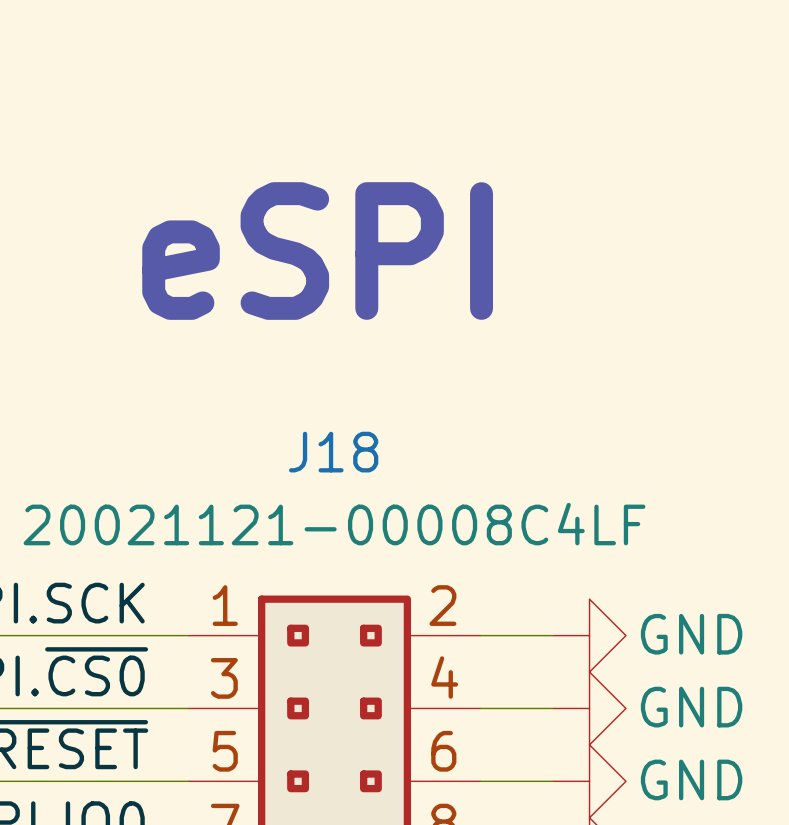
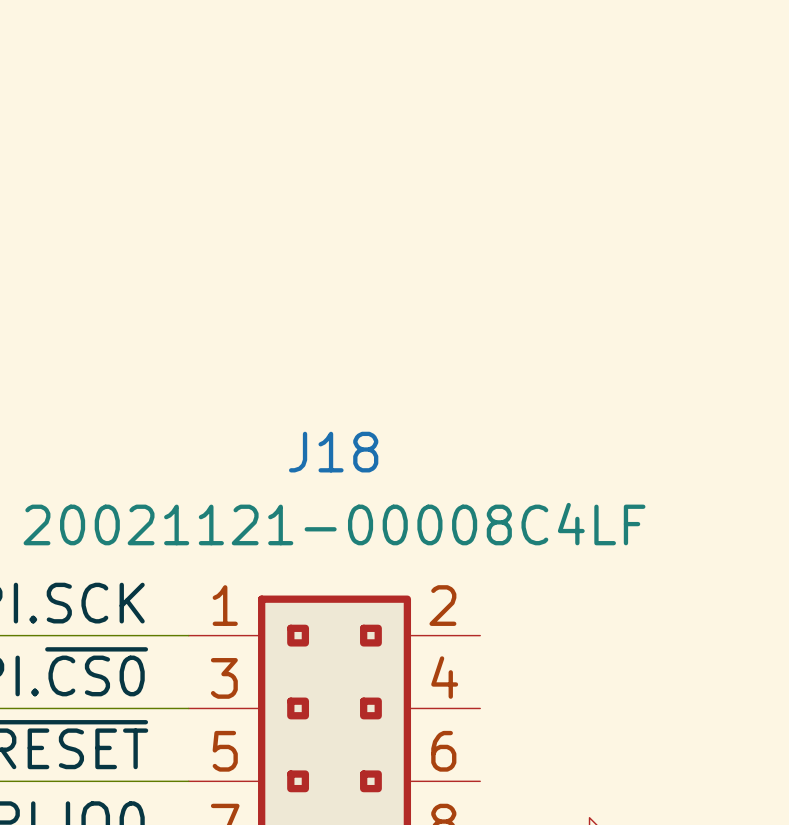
text: eSPI (317, 251) -> none
wire: (480, 635) (553, 635) -> none
power symbol: GND (589, 635) -> none
wire: (480, 708) (553, 708) -> none
power symbol: GND (589, 708) -> none
wire: (480, 781) (553, 781) -> none
power symbol: GND (589, 781) -> none

